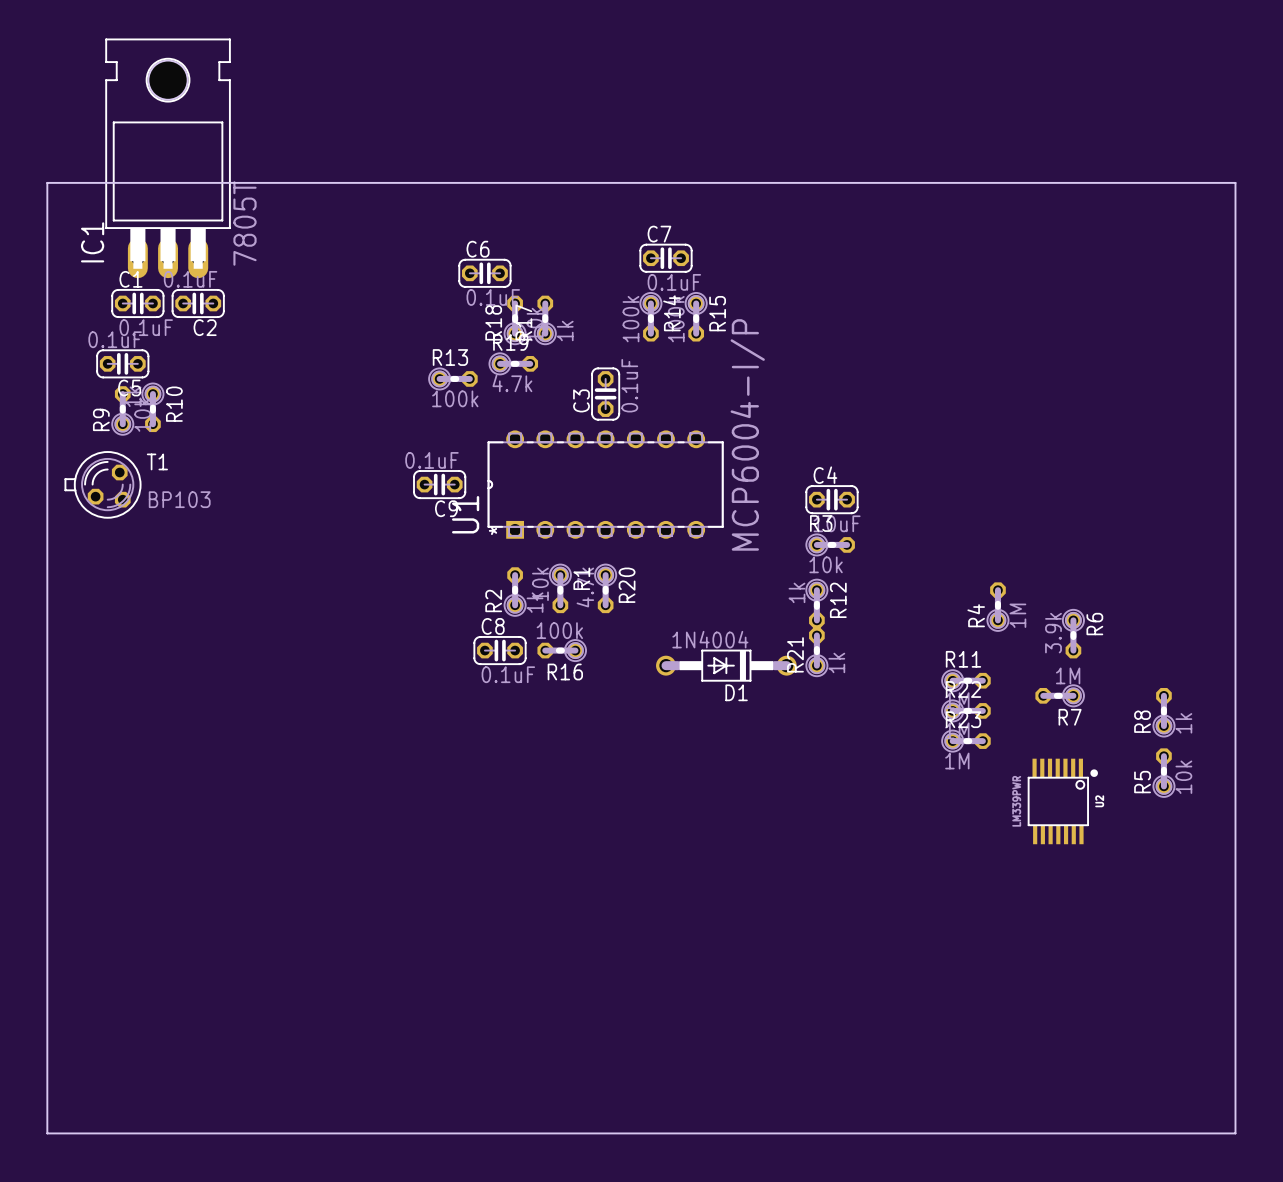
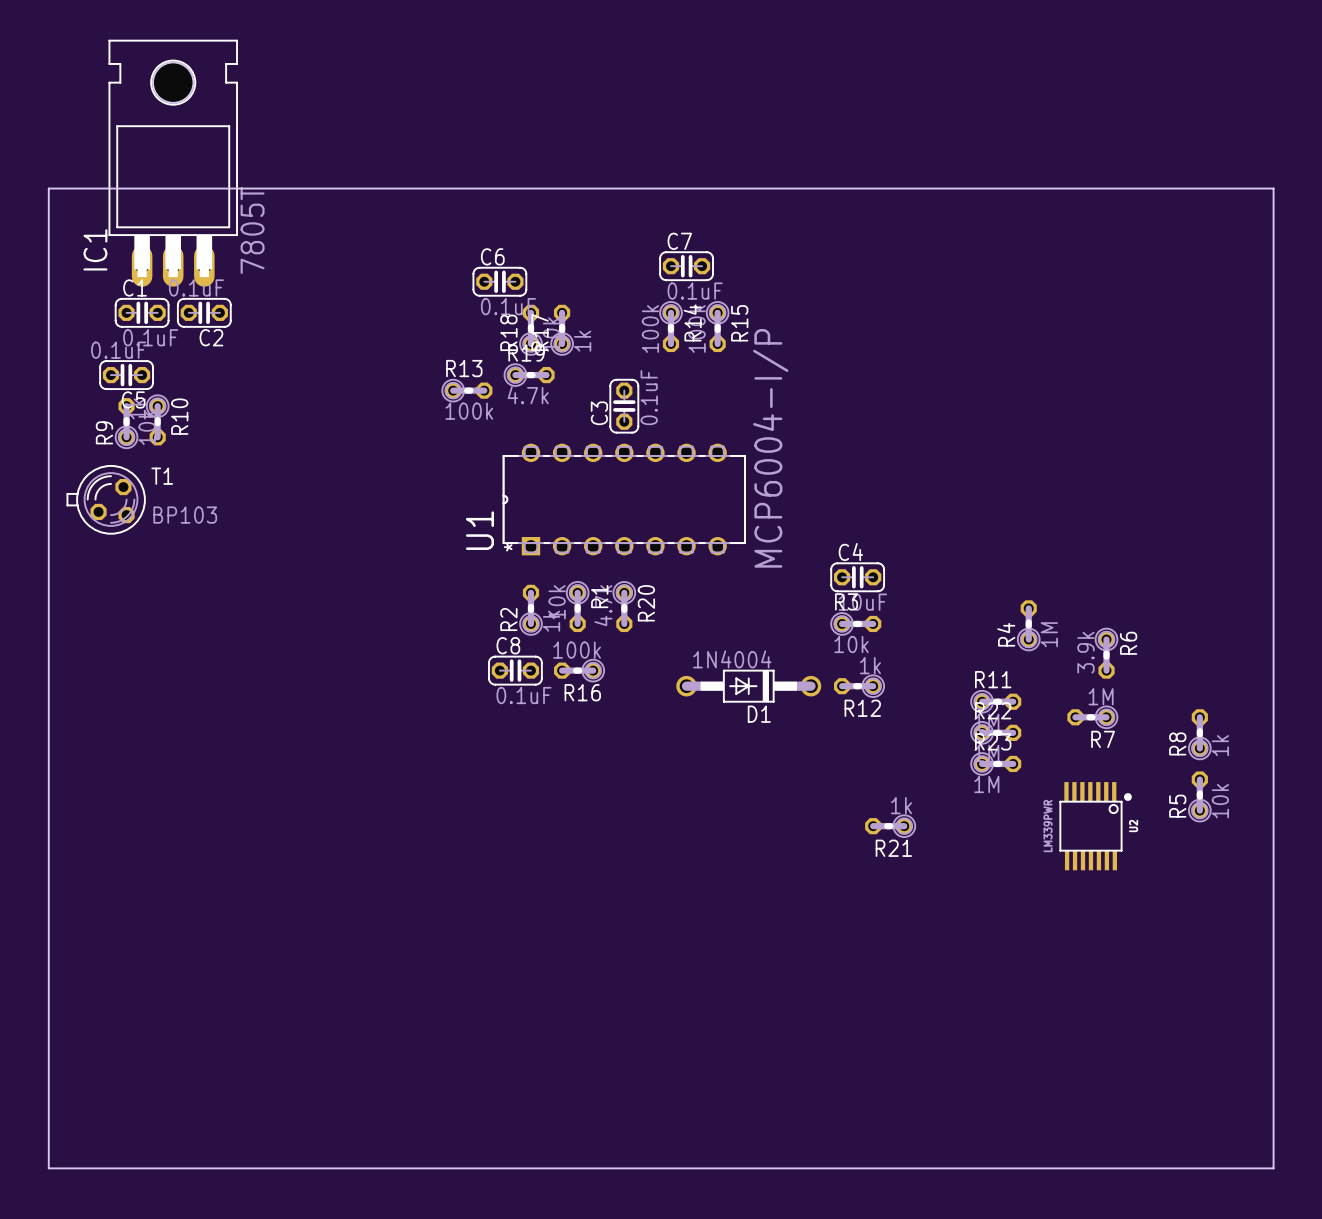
C9: 0.1uF (439, 484) -> none
C4 position: (831, 499) -> (857, 577)
R3 position: (830, 544) -> (855, 623)
R12 rotation: 0° (816, 603) -> 90° clockwise (859, 686)
R12 position: (816, 603) -> (859, 686)
R21 rotation: 0° (816, 652) -> 90° counterclockwise (890, 826)
R21 position: (816, 652) -> (890, 826)

